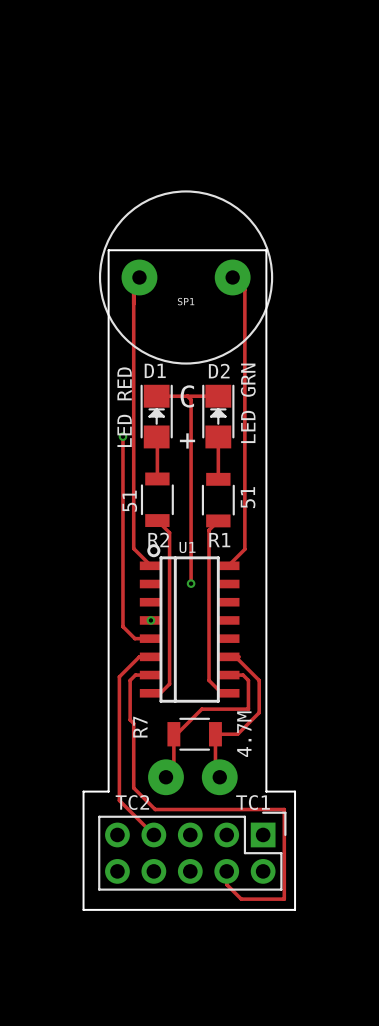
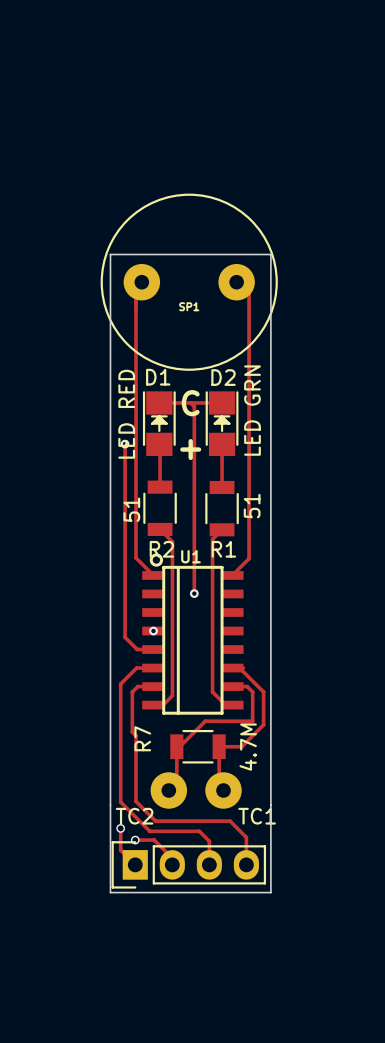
track: (139, 656) (119, 676) (119, 800) (153, 834) -> (141, 668) (136, 668) (120, 684) (120, 802) (149, 831) (199, 831) (209, 841) (209, 864)
board edge: (108, 791) (83, 791) (83, 909) (295, 909) (295, 791) (266, 791) -> (110, 805) (110, 892) (270, 892) (270, 805)
track: (153, 807) (155, 809) (284, 809) (284, 899) (241, 899) (226, 884) (226, 871) -> (155, 821) (230, 821) (246, 837) (246, 864)
part footprint: [98, 811, 287, 891] -> [111, 841, 267, 889]
track: none -> (120, 828) (120, 850) (135, 864)
via: none -> (120, 828)
track: none -> (135, 840) (154, 840) (172, 858) (172, 864)
via: none -> (135, 840)

